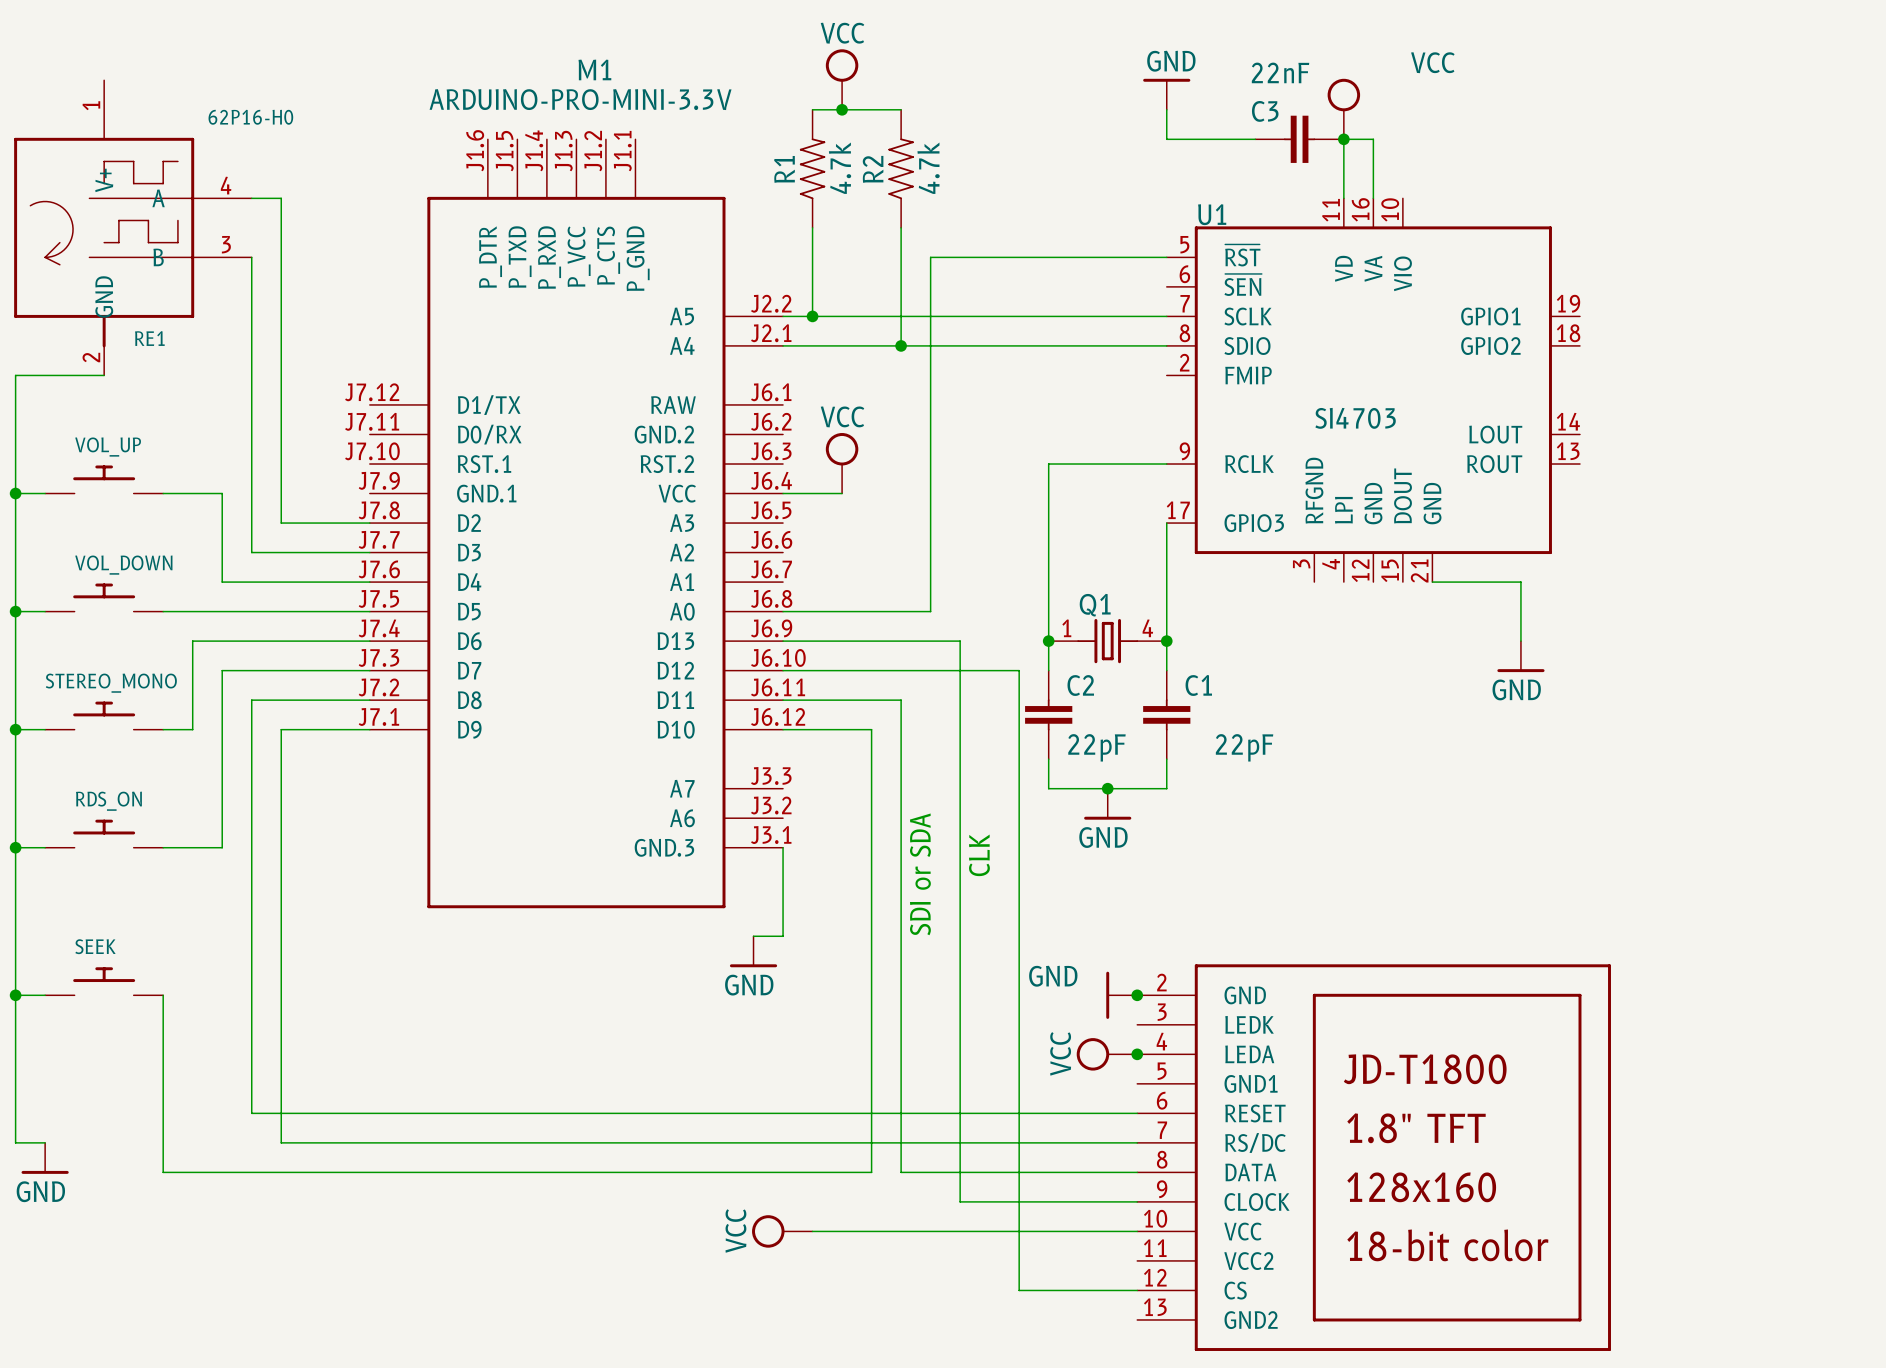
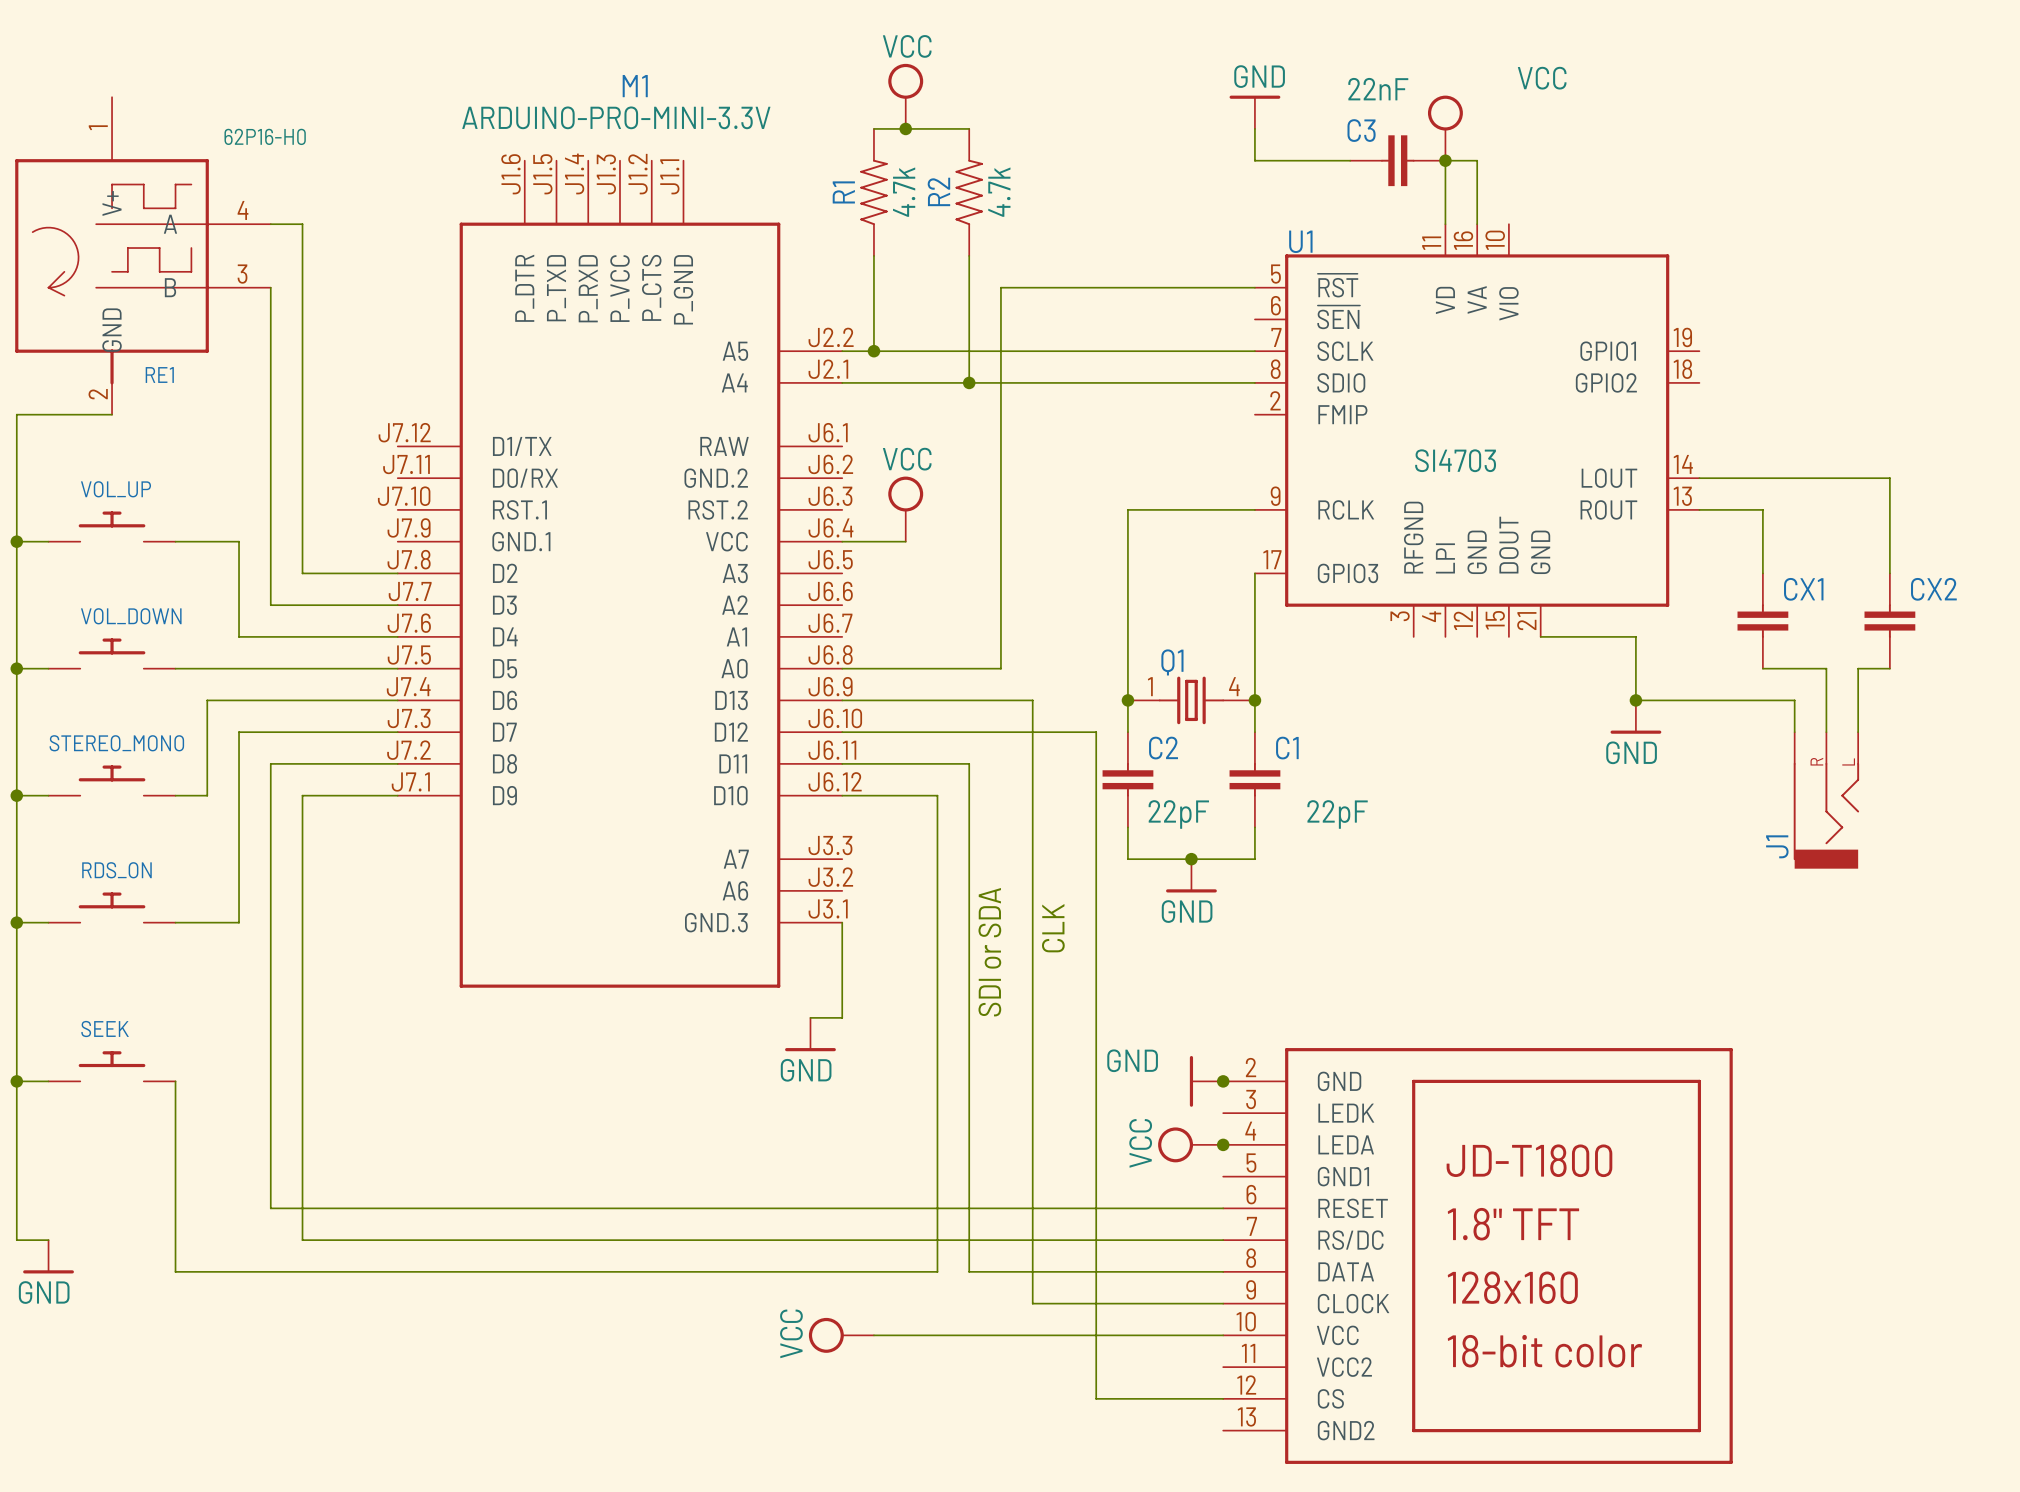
wire: none -> (1699, 478) (1889, 478) (1889, 573)
wire: none -> (1699, 509) (1762, 509) (1762, 573)
CX1: none -> (1762, 621)
CX2: none -> (1889, 621)
wire: none -> (1762, 668) (1826, 668) (1826, 732)
wire: none -> (1889, 668) (1858, 668) (1858, 732)
wire: none -> (1635, 700) (1794, 700) (1794, 732)
junction: none -> (1635, 700)
J1: none -> (1826, 800)

